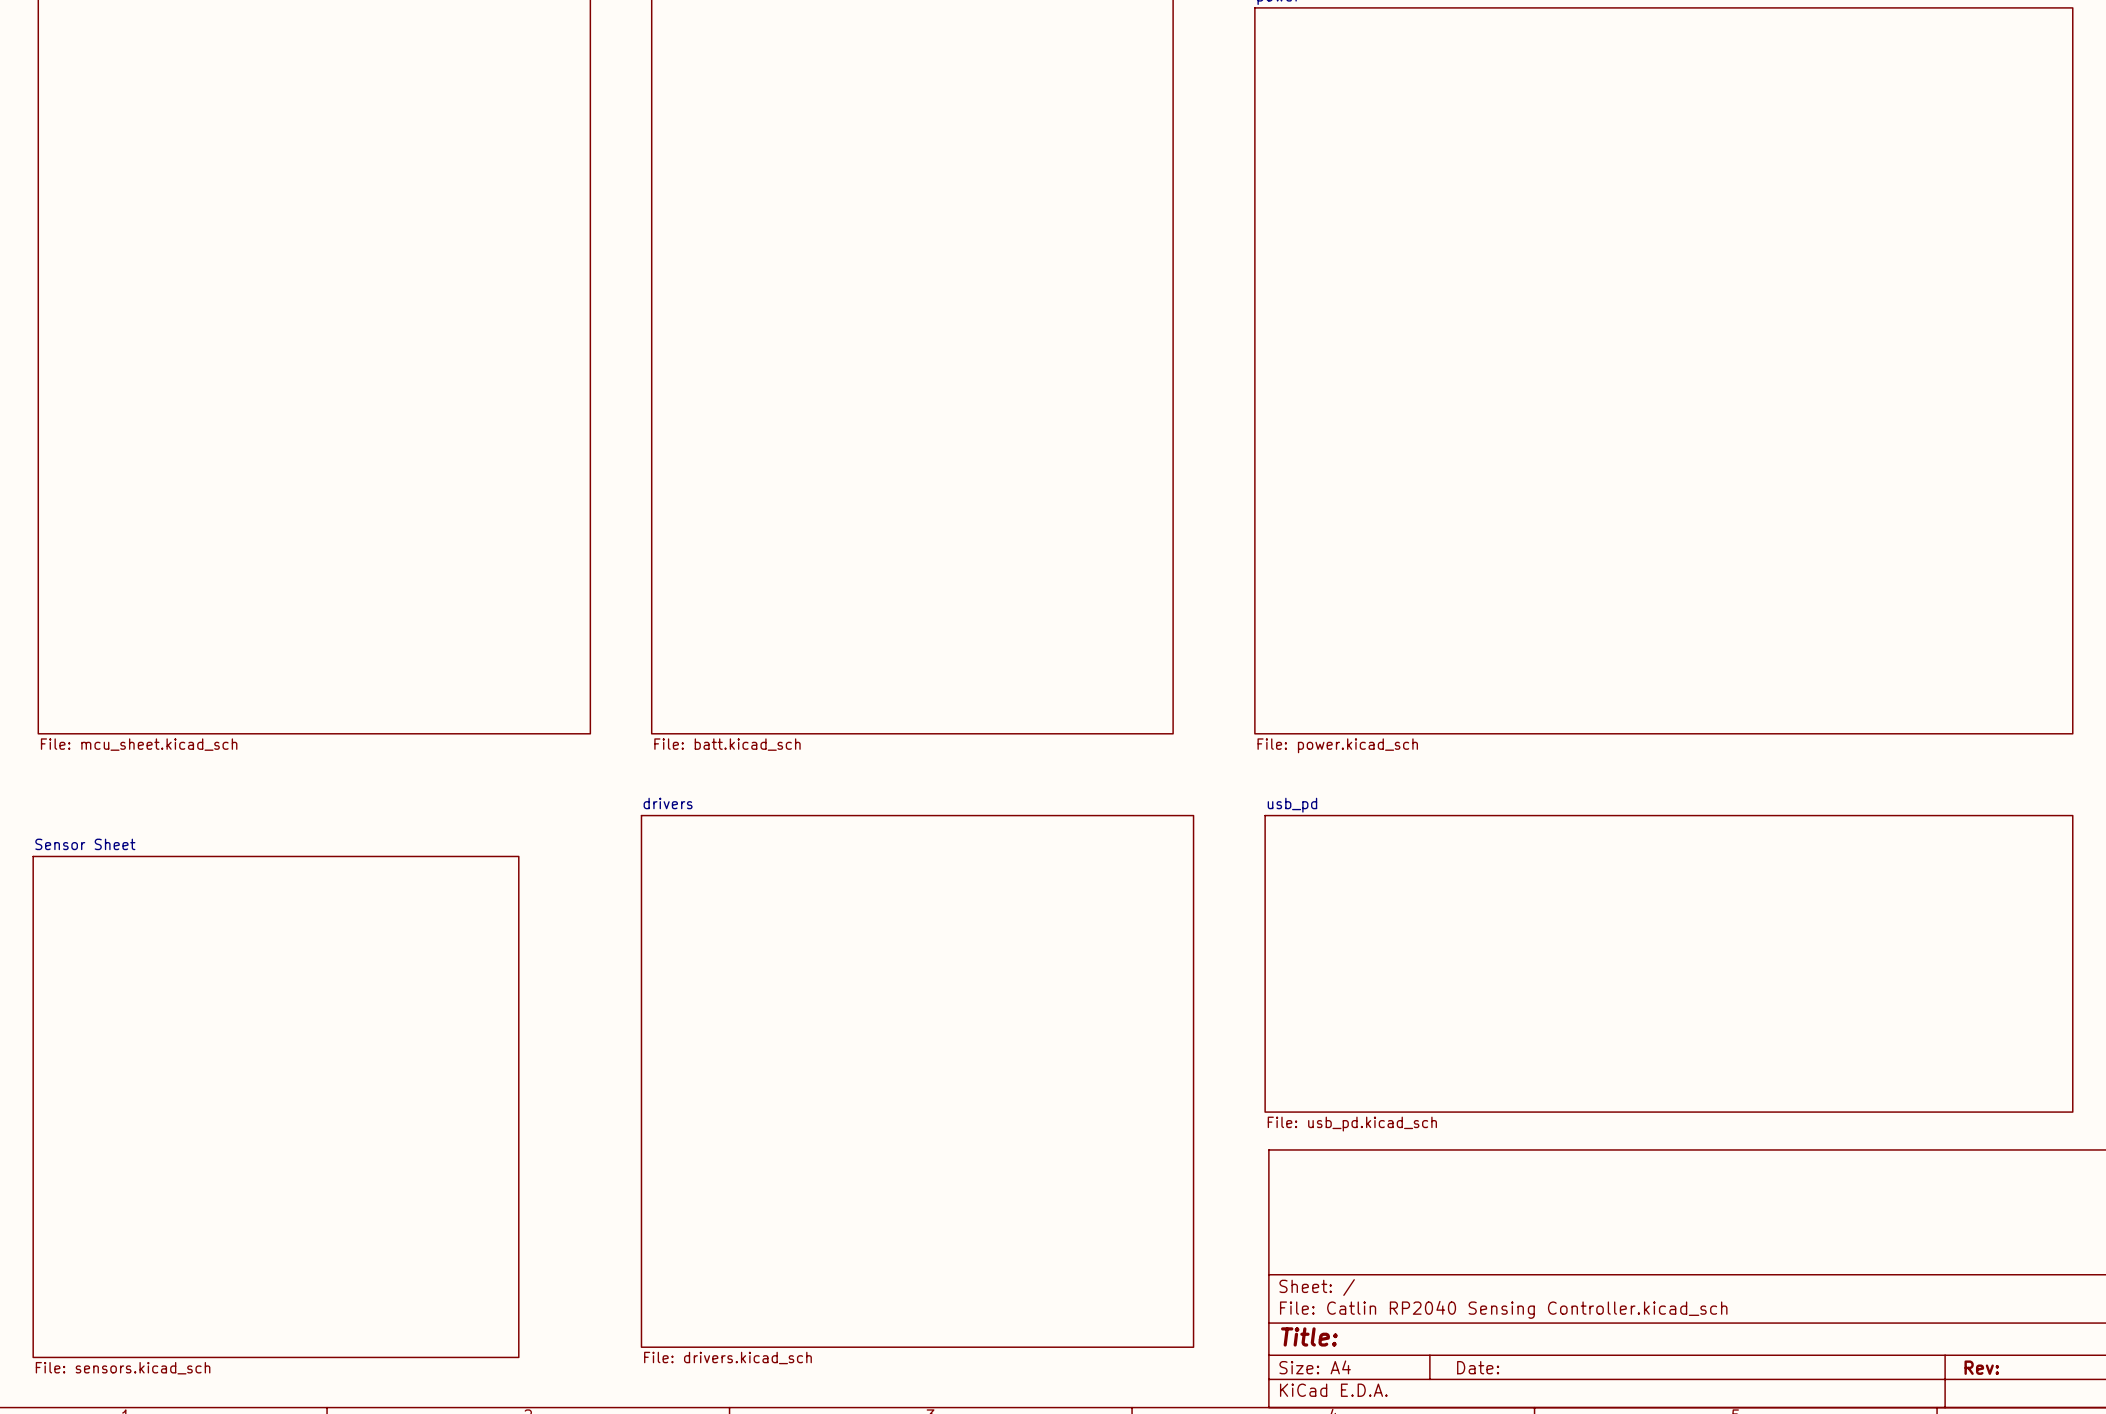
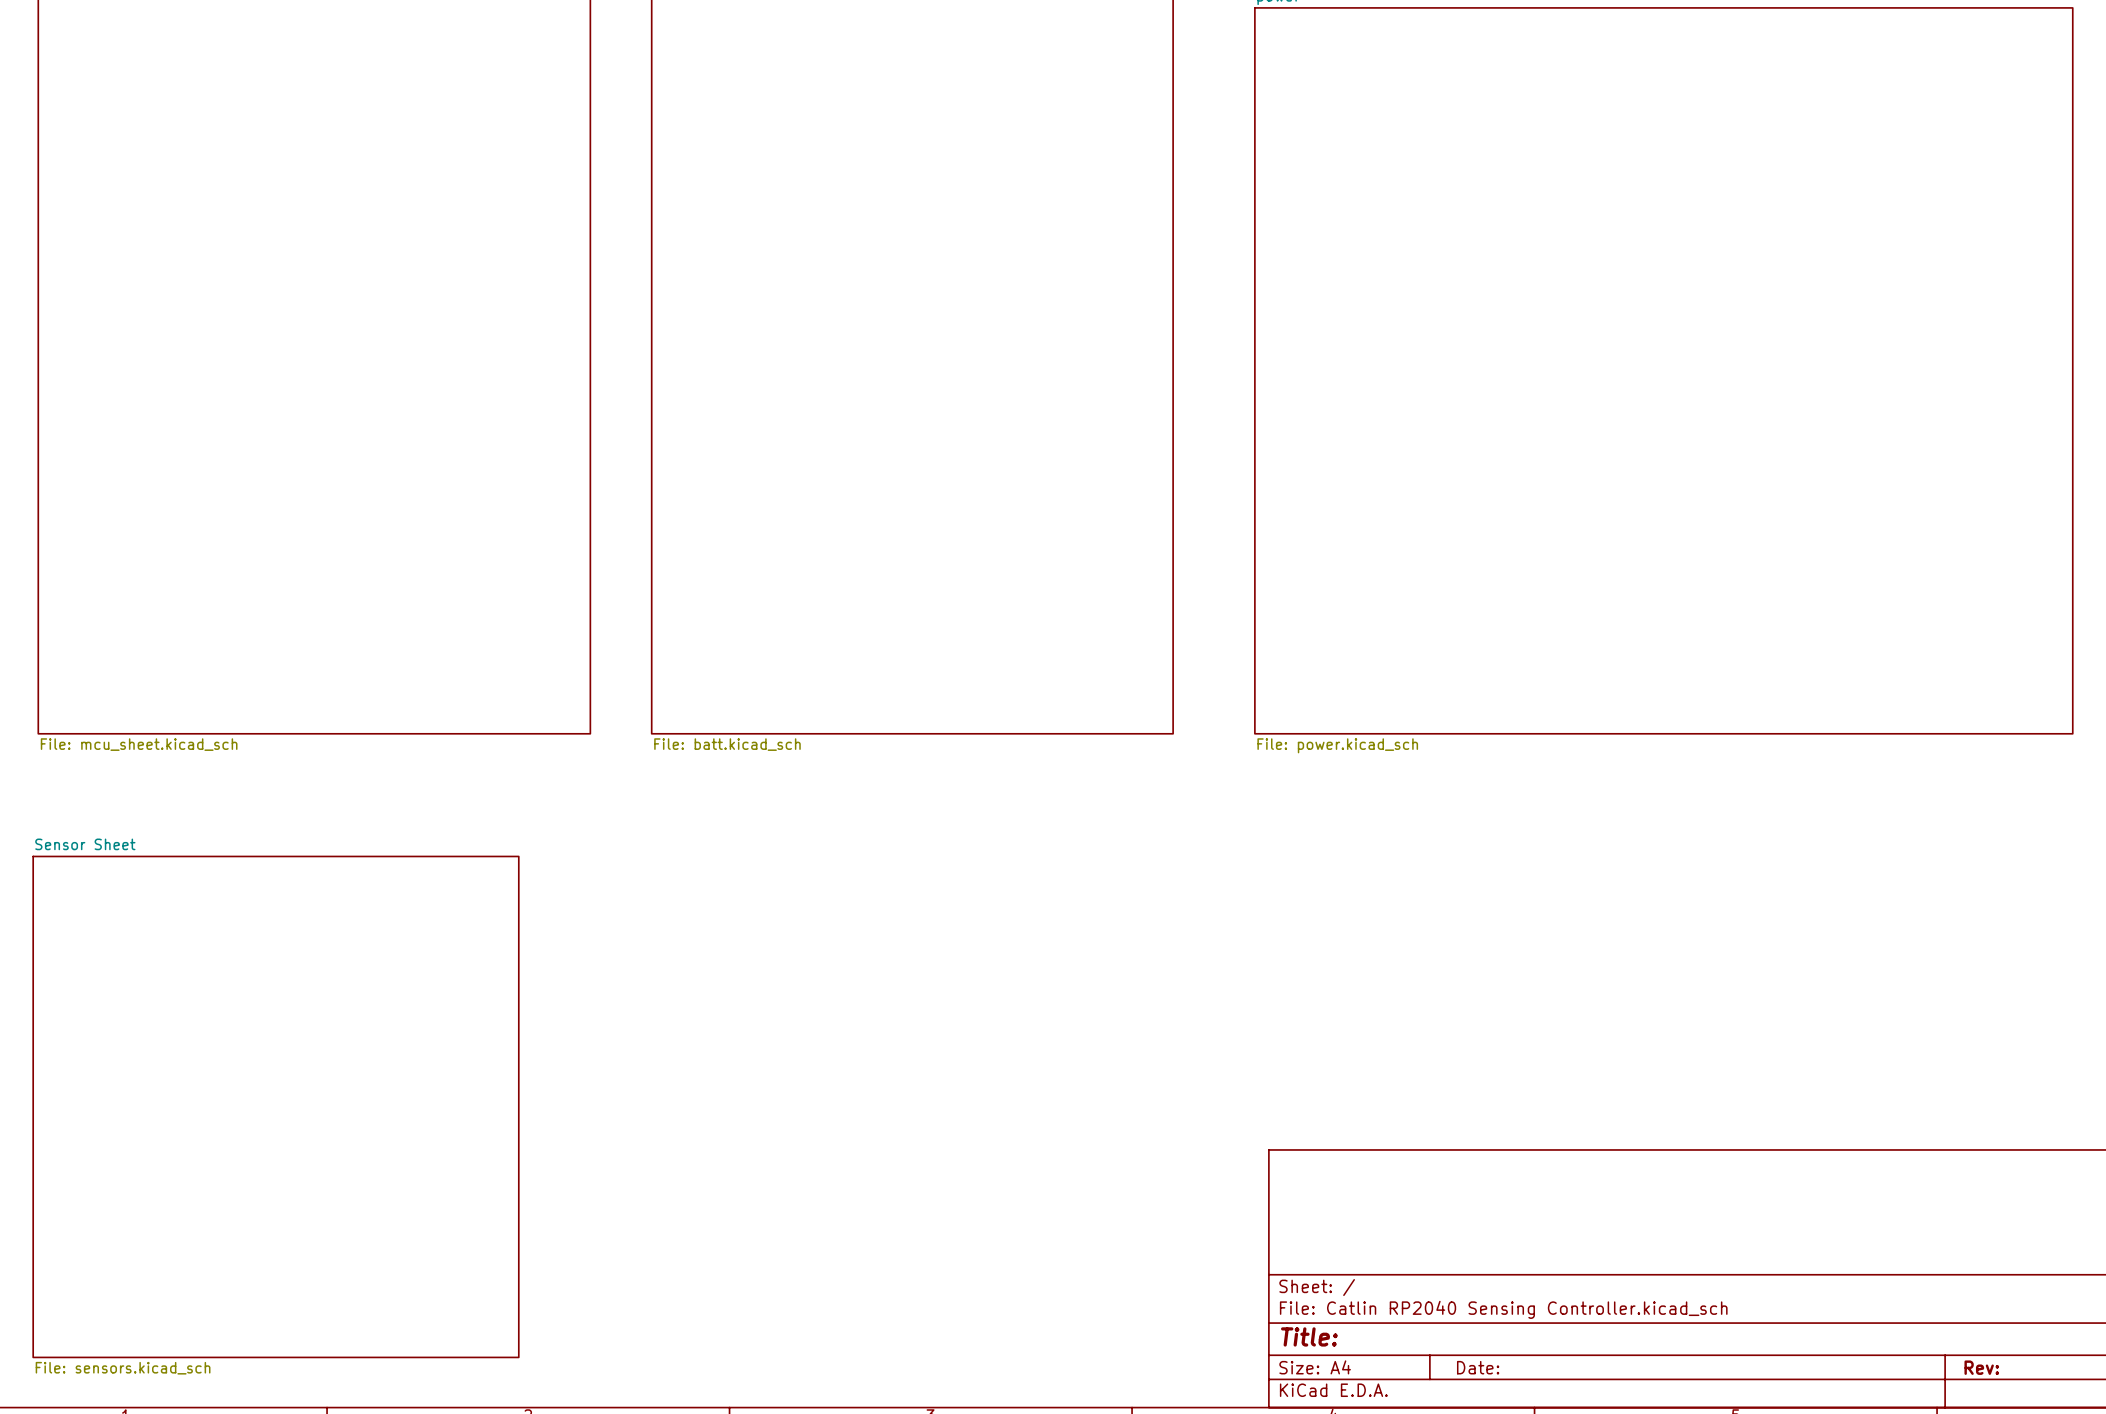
sheet usb_pd: File: usb_pd.kicad_sch (1668, 963) -> none
sheet drivers: File: drivers.kicad_sch (917, 1081) -> none

